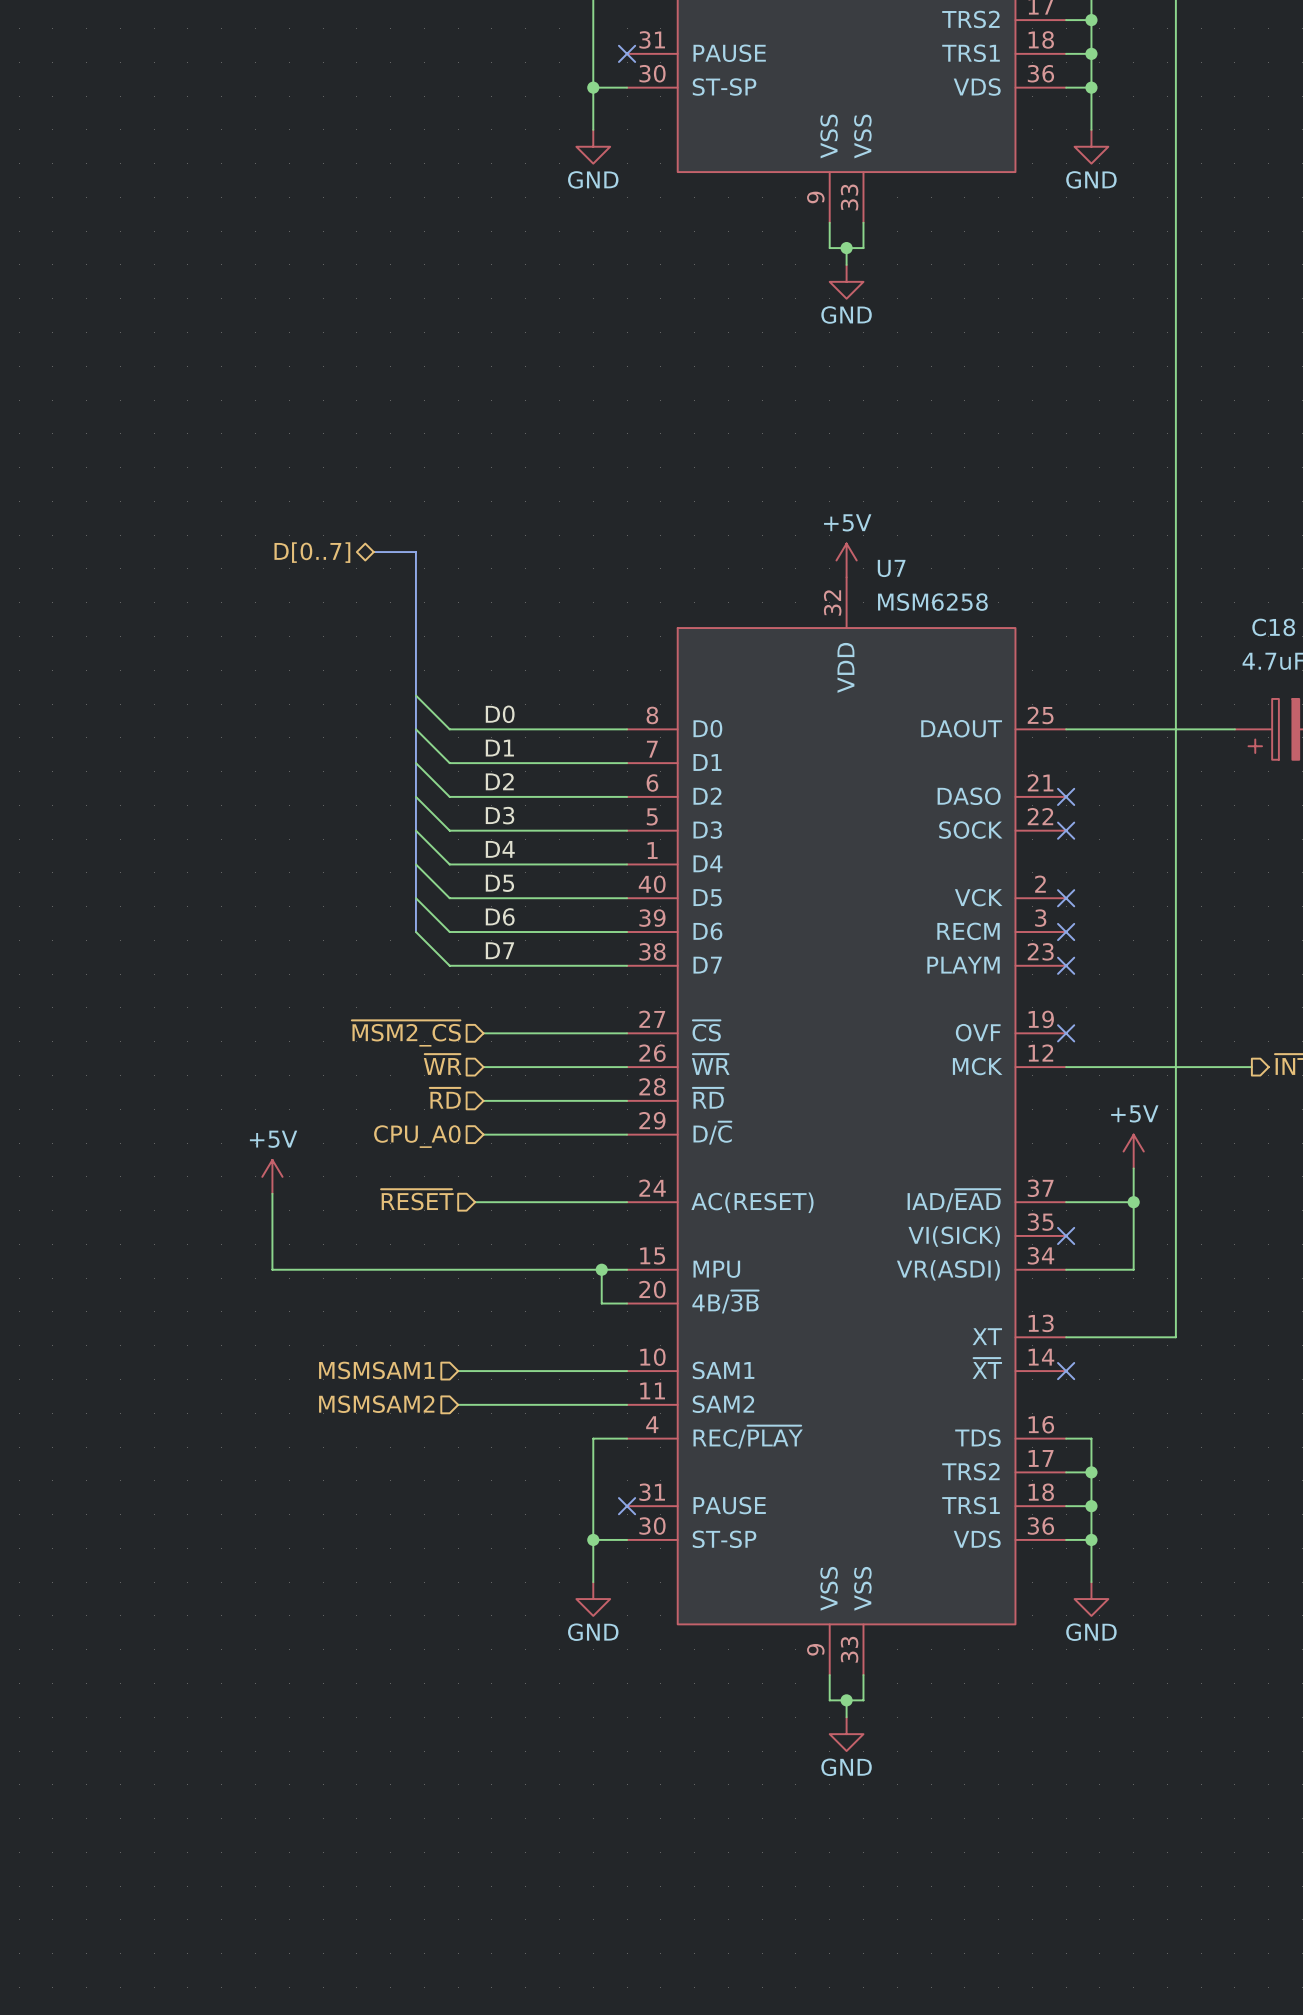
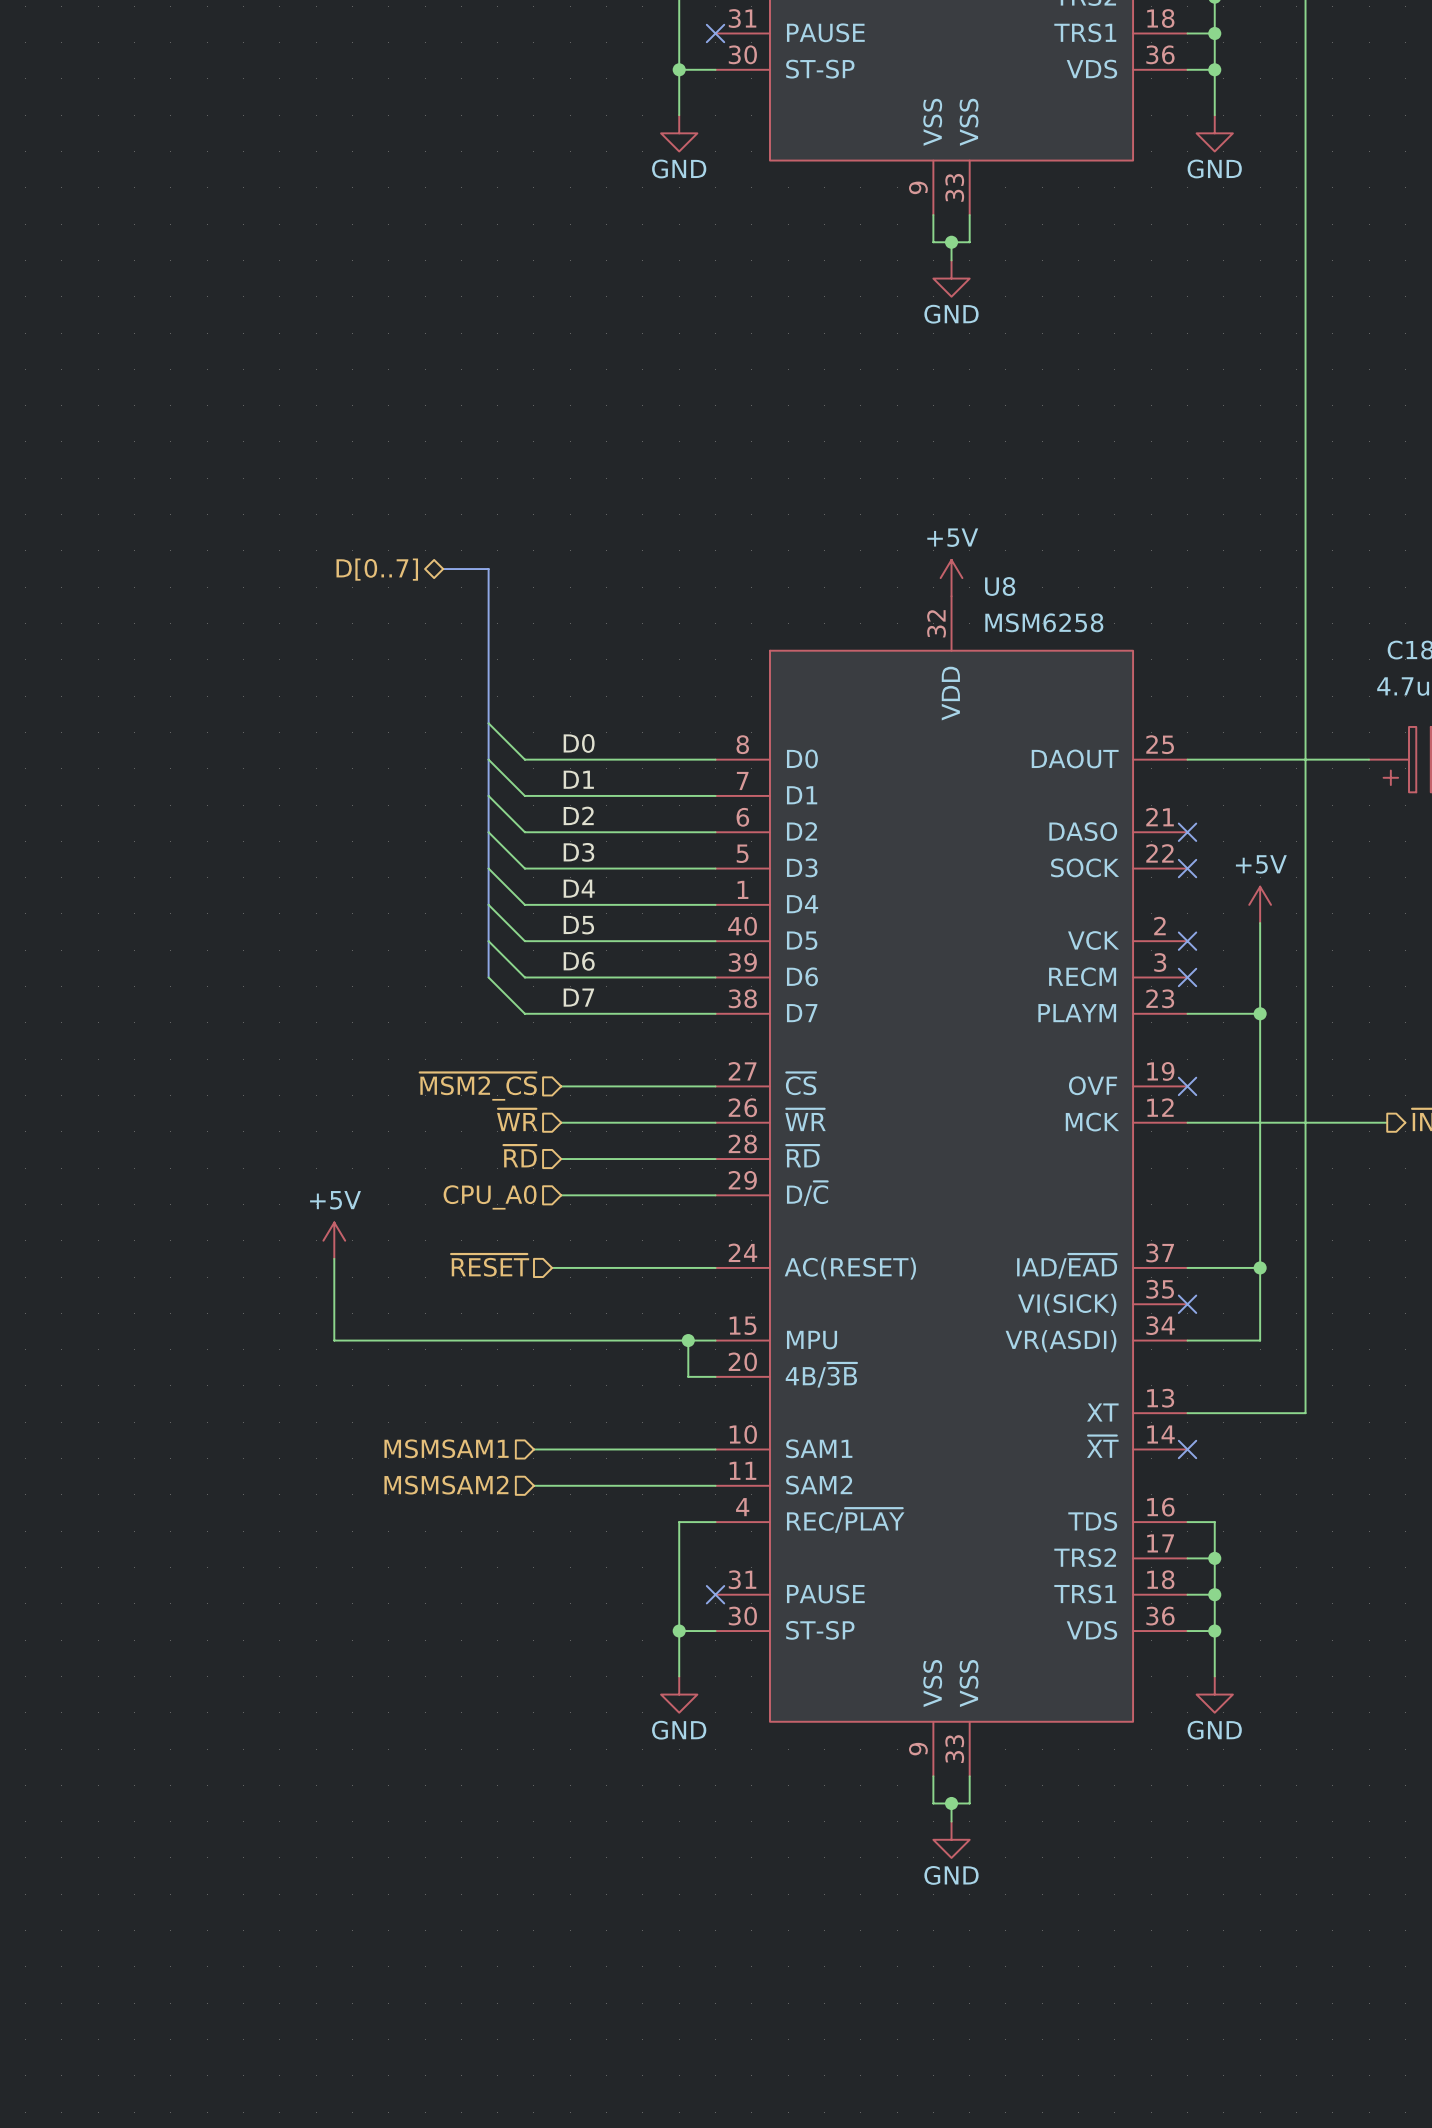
U7 name: U7 (891, 568) -> U8 (1000, 586)
wire: none -> (1260, 923) (1260, 1231)
wire: none -> (1187, 1013) (1260, 1013)
no-connect mark: (1066, 965) -> none
junction: none -> (1260, 1013)
power symbol position: +5V (1133, 1151) -> +5V (1260, 904)

